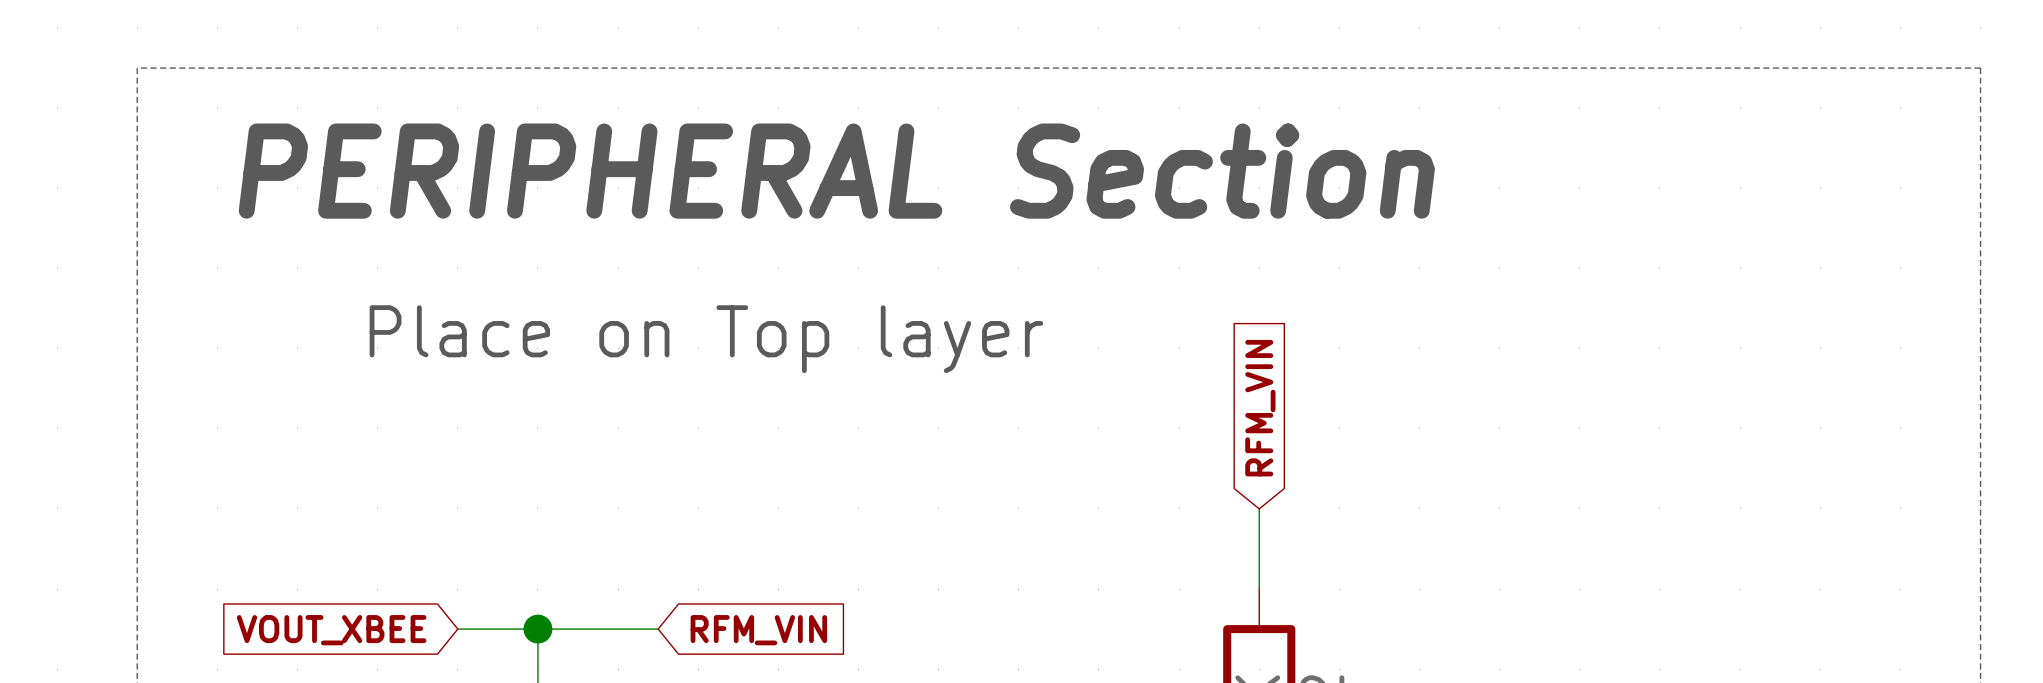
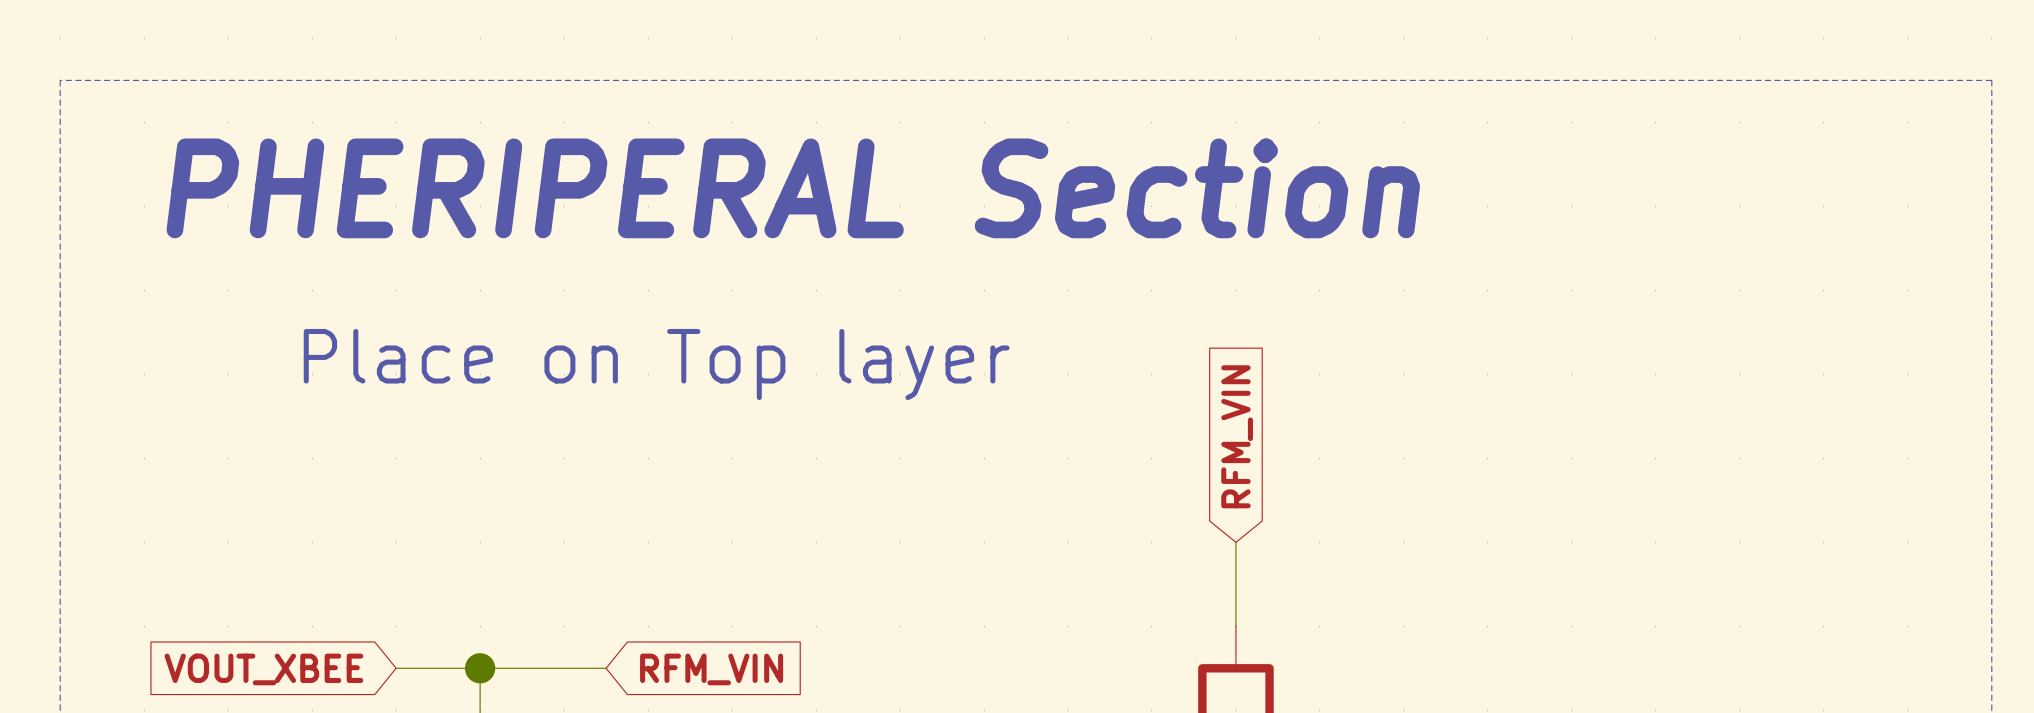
text: PERIPHERAL Section (836, 171) -> PHERIPERAL Section (793, 188)

